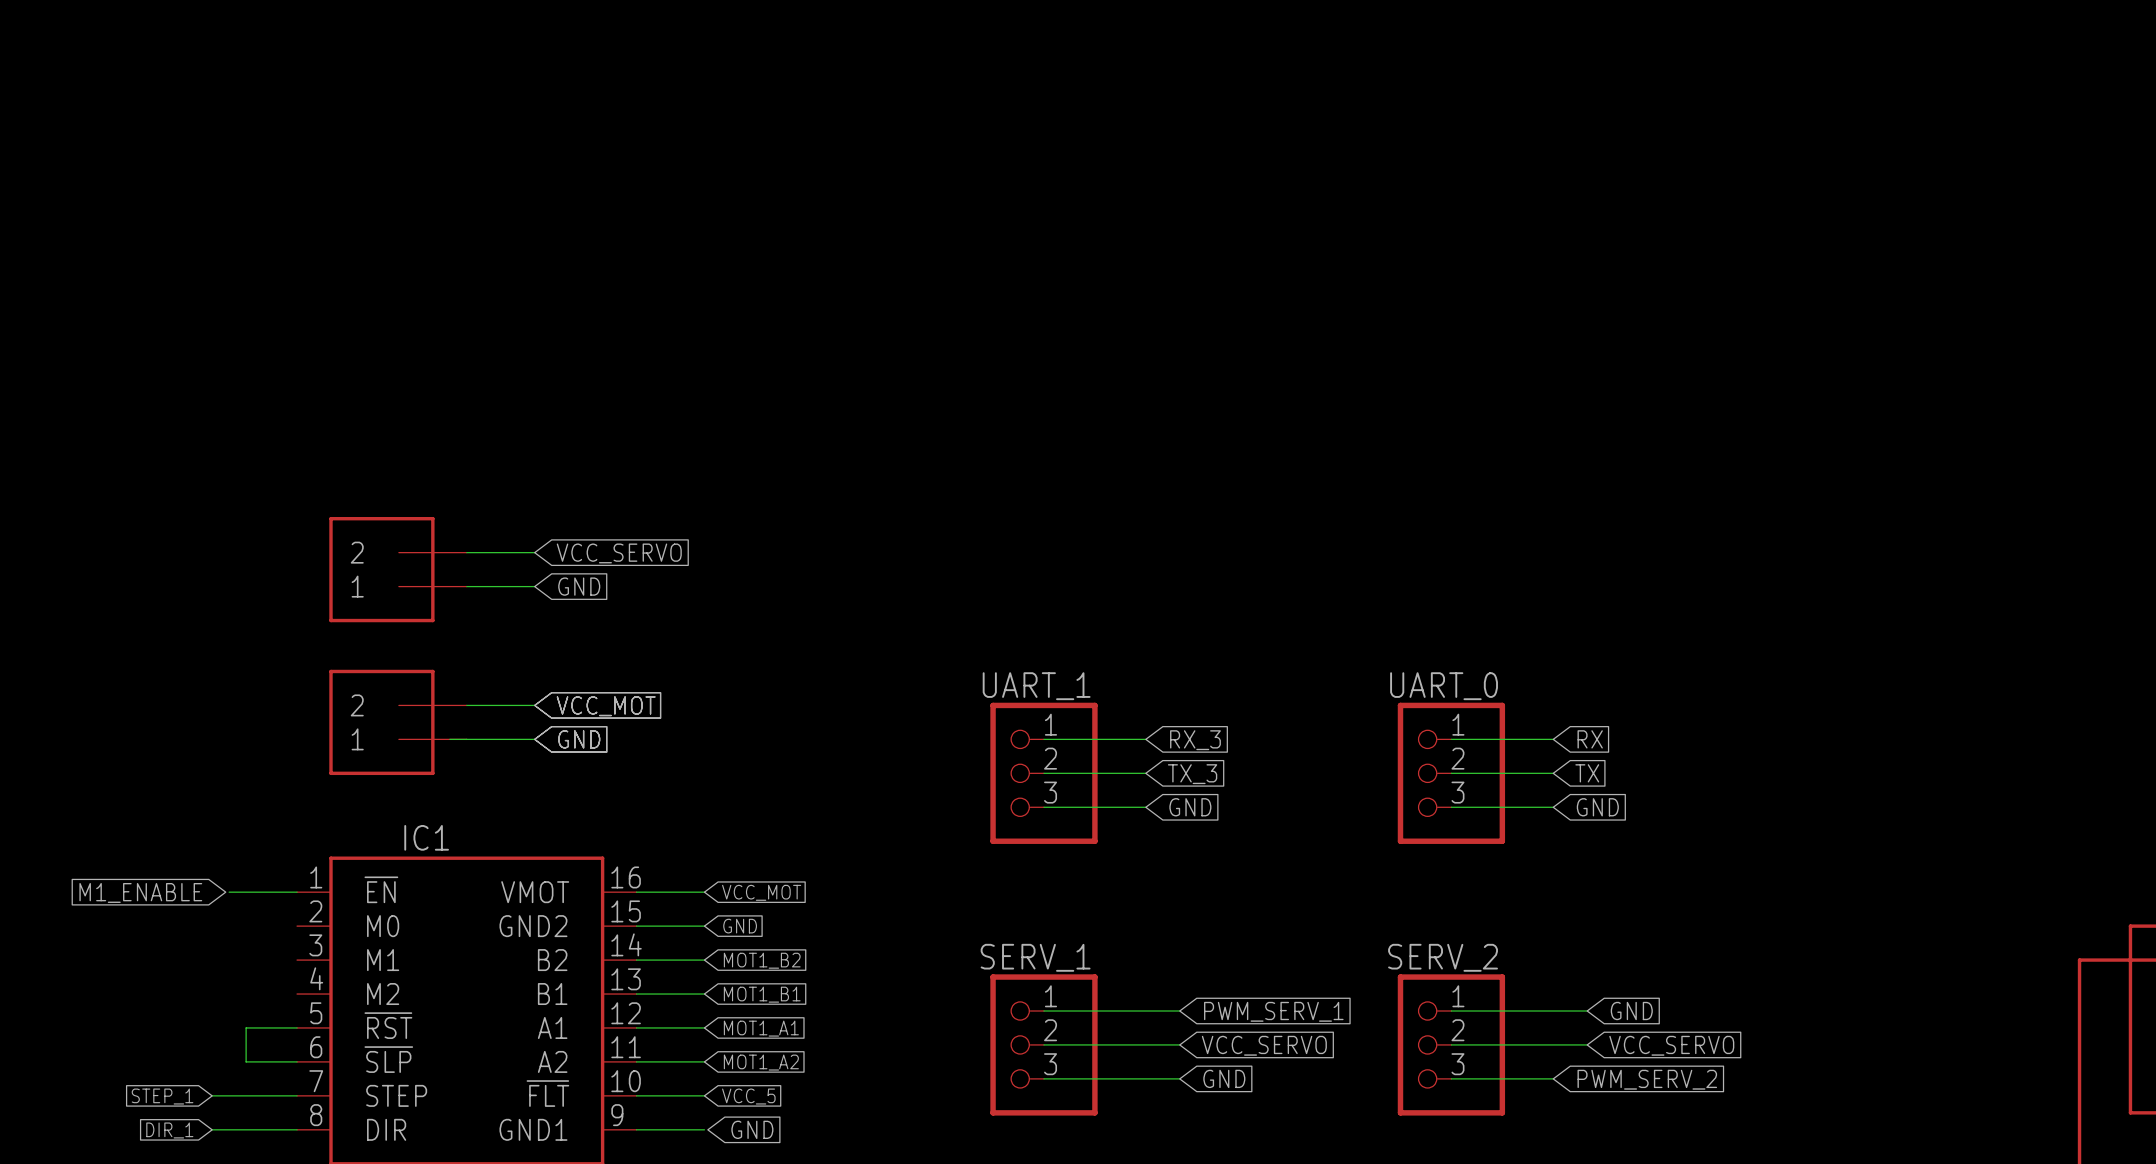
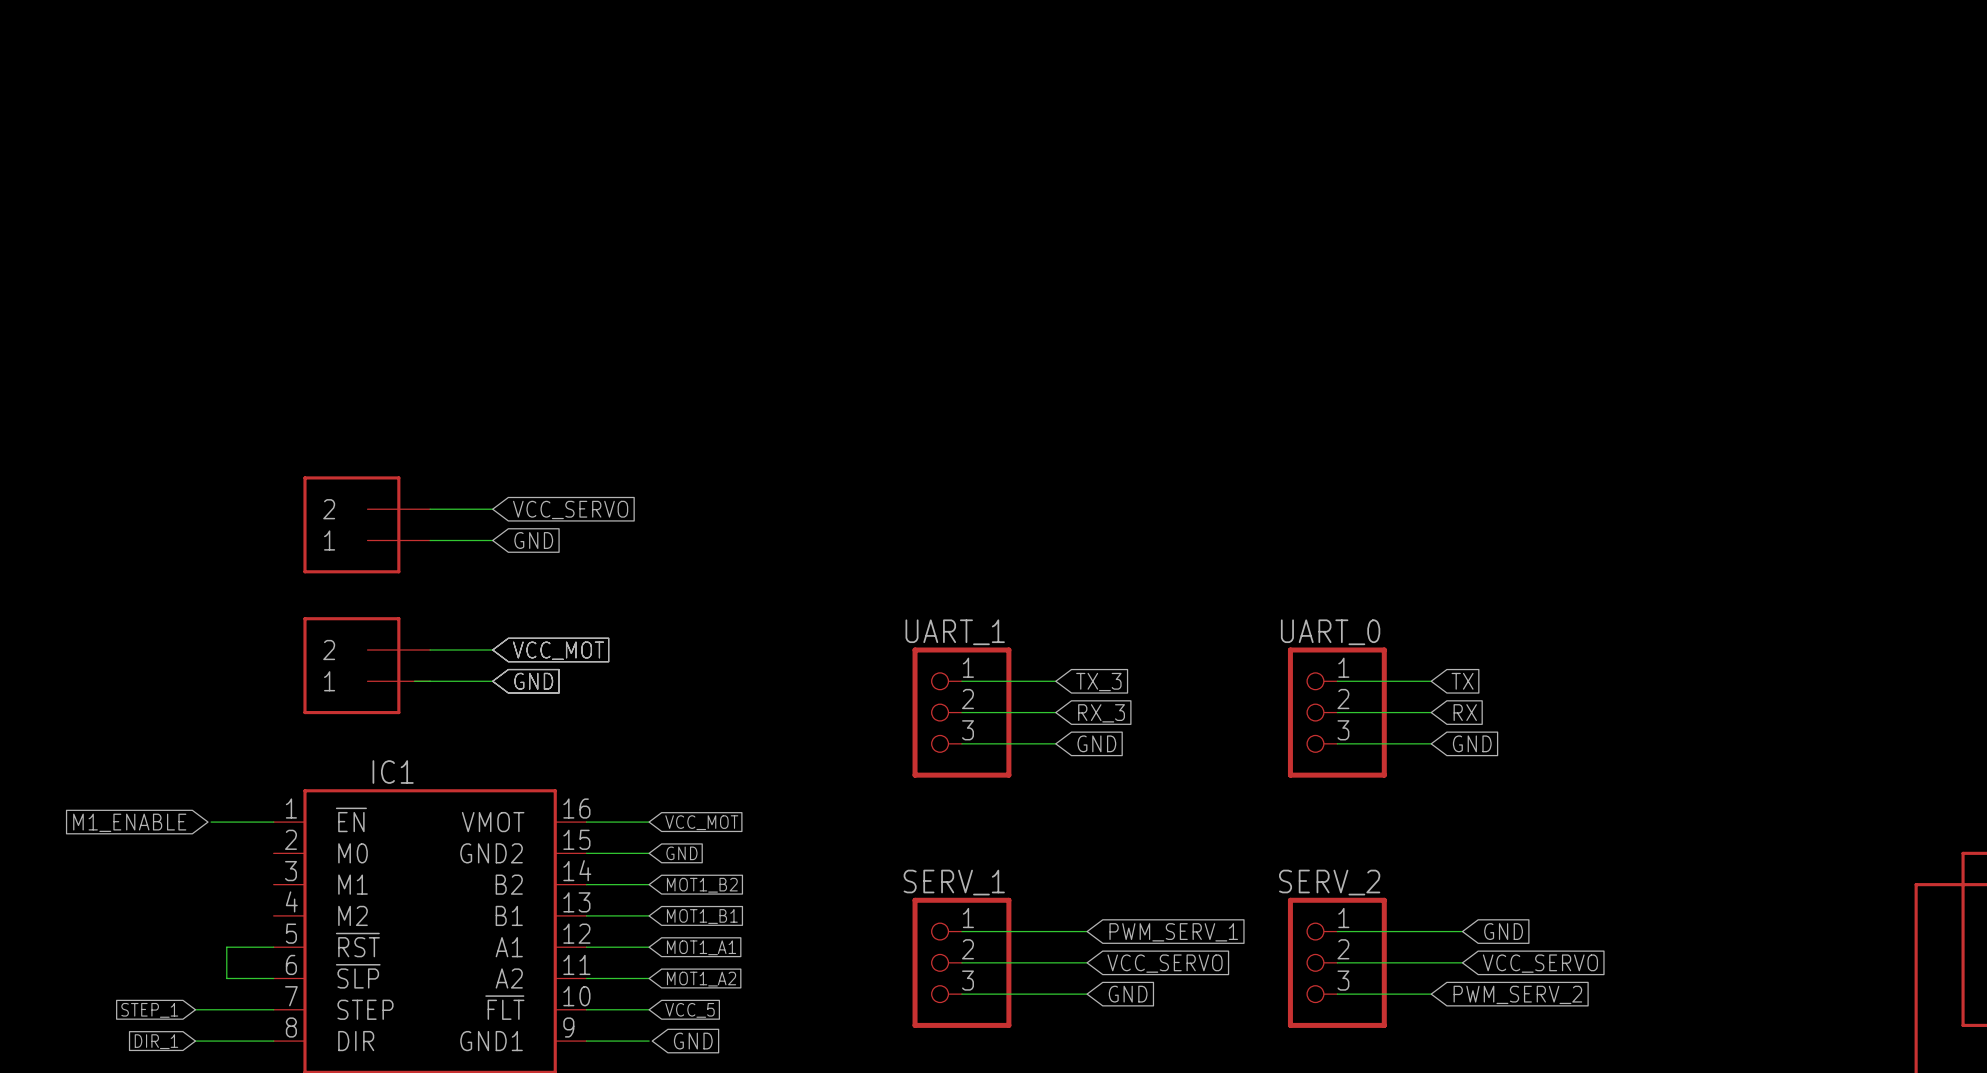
global label: RX (1590, 739) -> TX (1462, 681)
global label: RX_3 (1195, 740) -> TX_3 (1098, 682)
global label: TX (1587, 773) -> RX (1465, 712)
global label: TX_3 (1192, 774) -> RX_3 (1101, 713)

